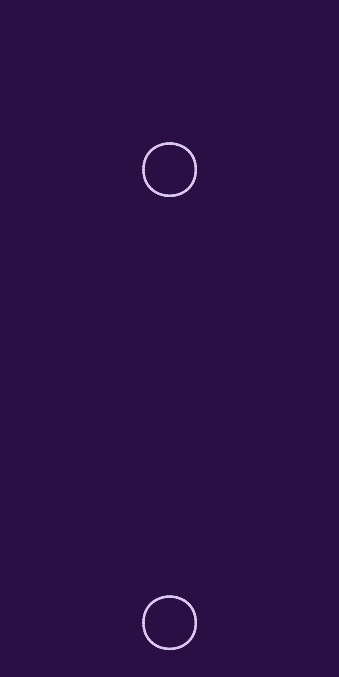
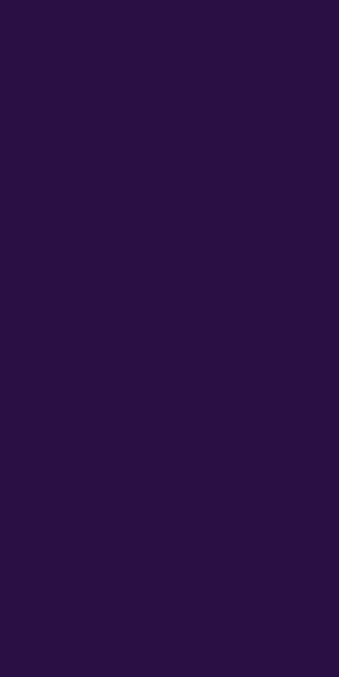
board edge: (167, 143) (155, 147) (148, 153) (144, 163) (143, 172) (145, 181) (151, 189) (160, 194) (172, 195) (183, 192) (190, 185) (195, 175) (195, 166) (193, 158) (187, 150) (179, 145) (167, 143) -> none
board edge: (167, 596) (155, 600) (148, 606) (144, 616) (143, 625) (145, 634) (151, 642) (160, 647) (172, 648) (183, 645) (190, 638) (195, 628) (195, 619) (193, 611) (187, 603) (179, 598) (167, 596) -> none

